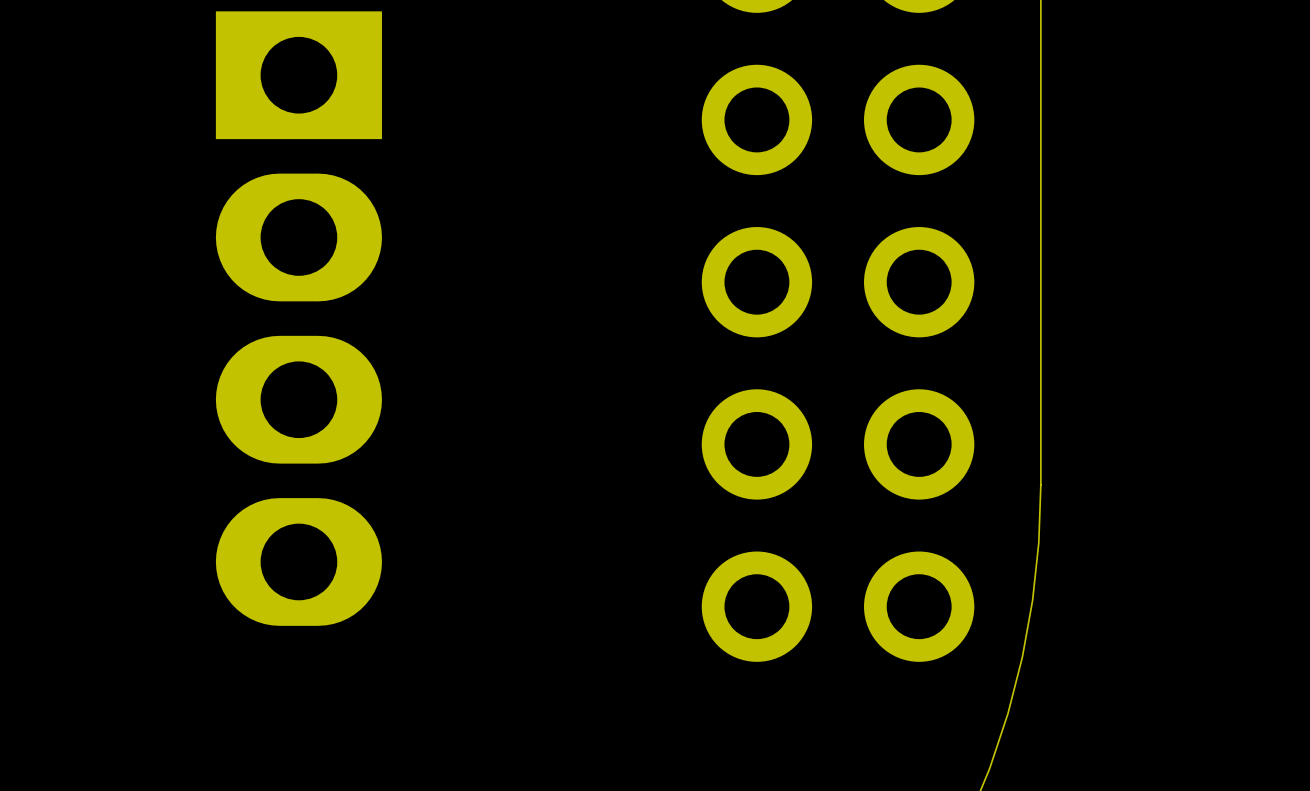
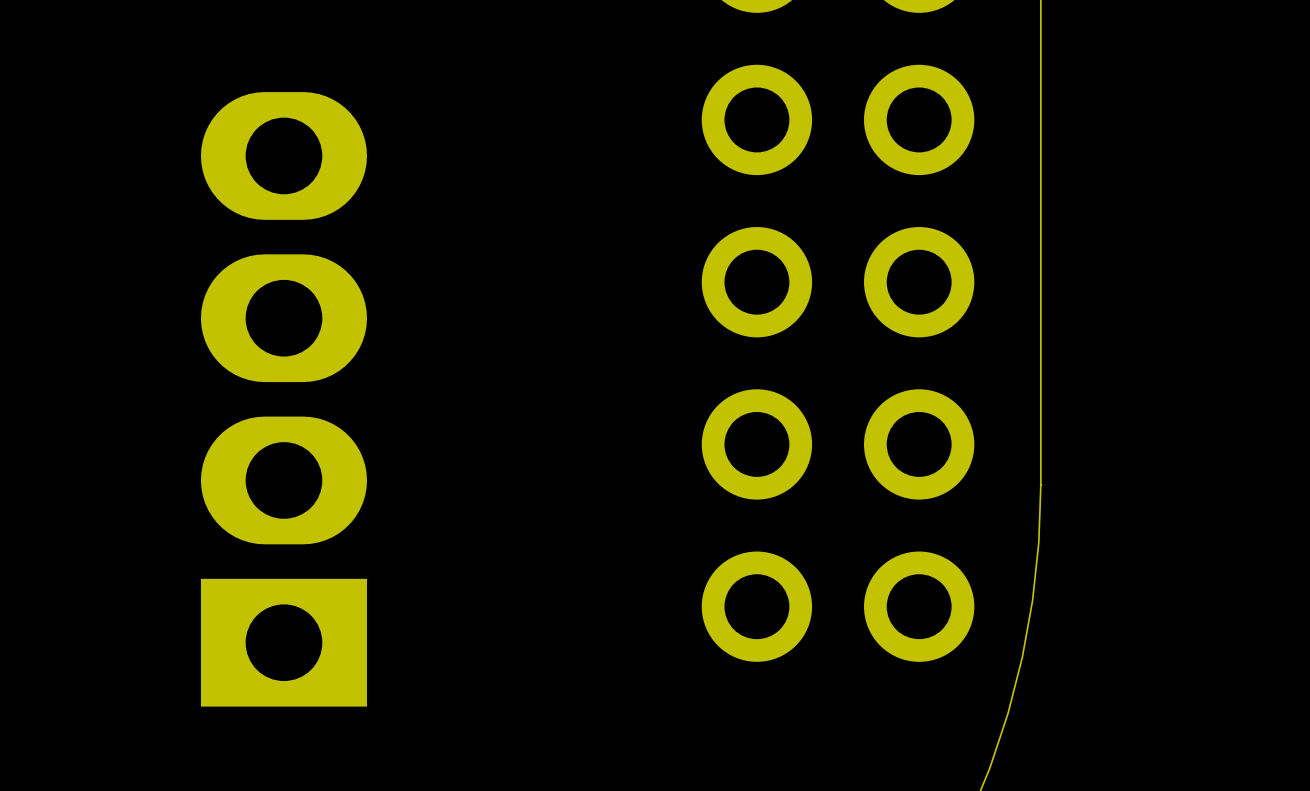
part rotation: 0° (298, 318) -> 180° (283, 399)

